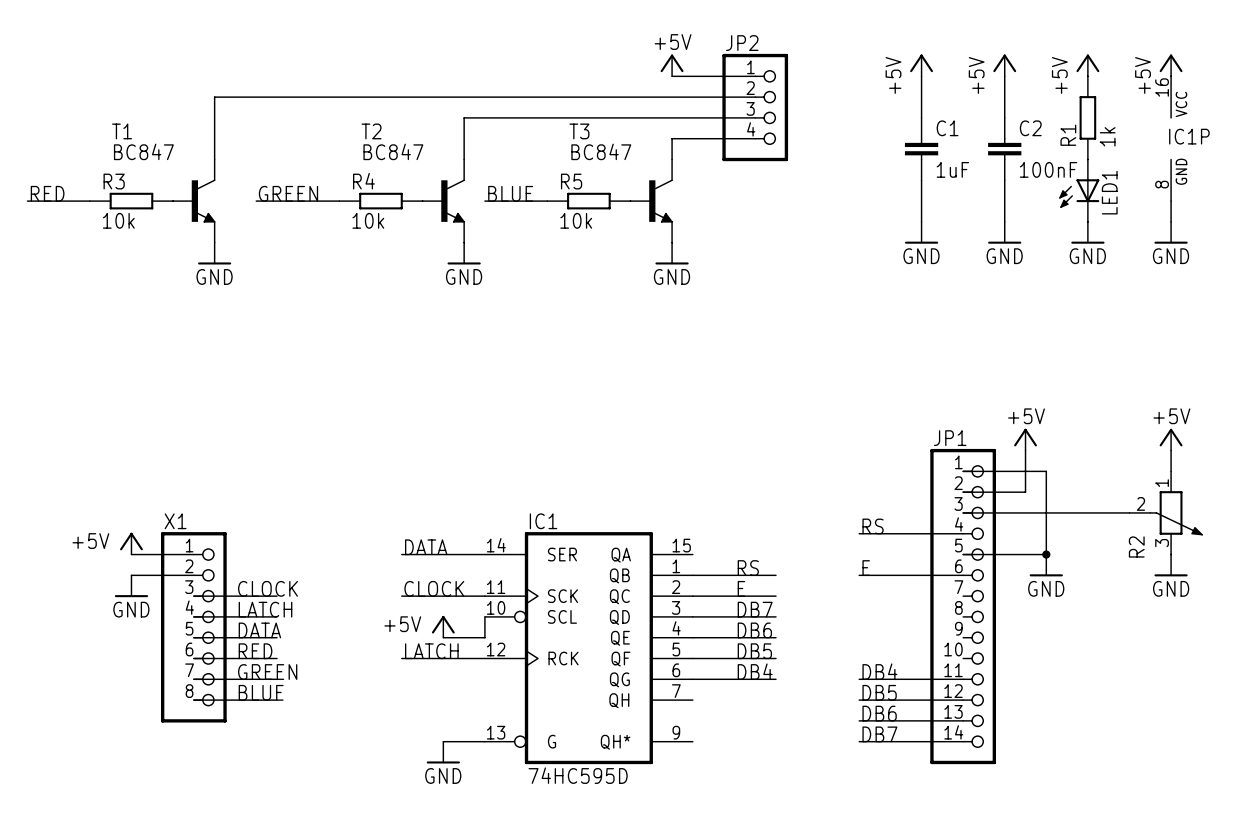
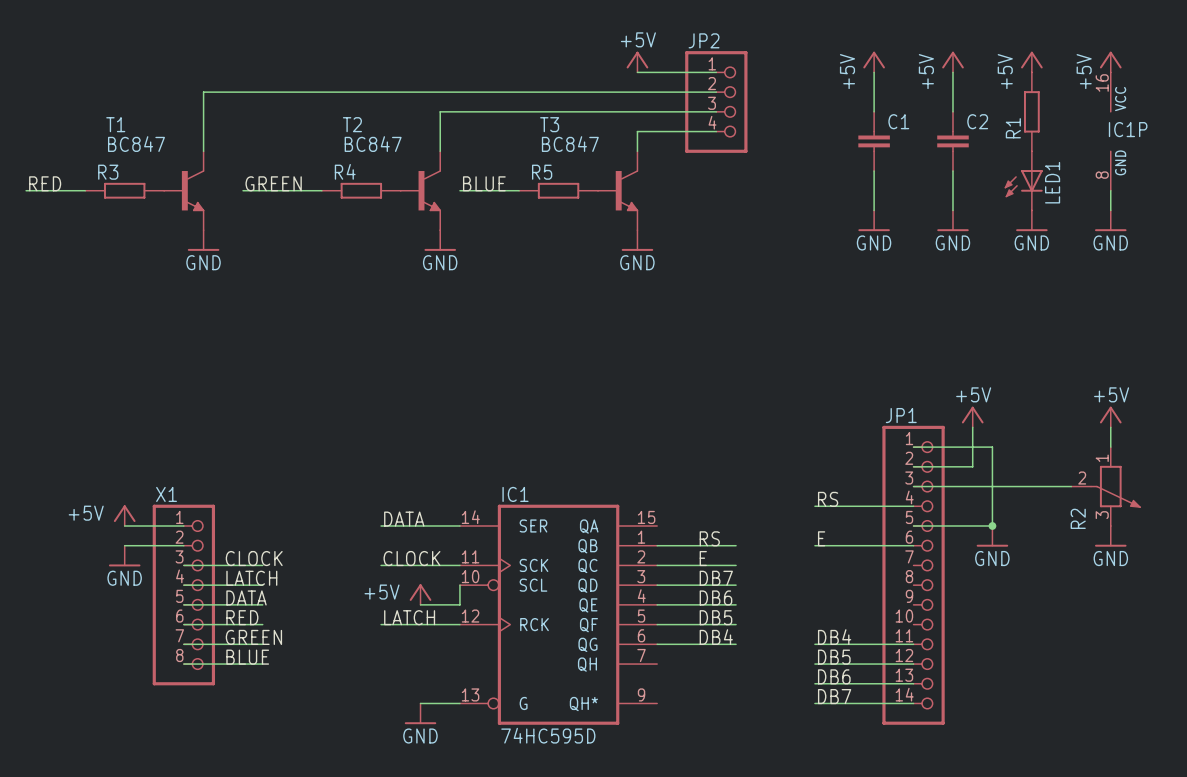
R1 value: 1k (1107, 136) -> none
C1 value: 1uF (952, 169) -> none
C2 value: 100nF (1048, 169) -> none
R3 value: 10k (118, 220) -> none
R4 value: 10k (368, 220) -> none
R5 value: 10k (576, 220) -> none

